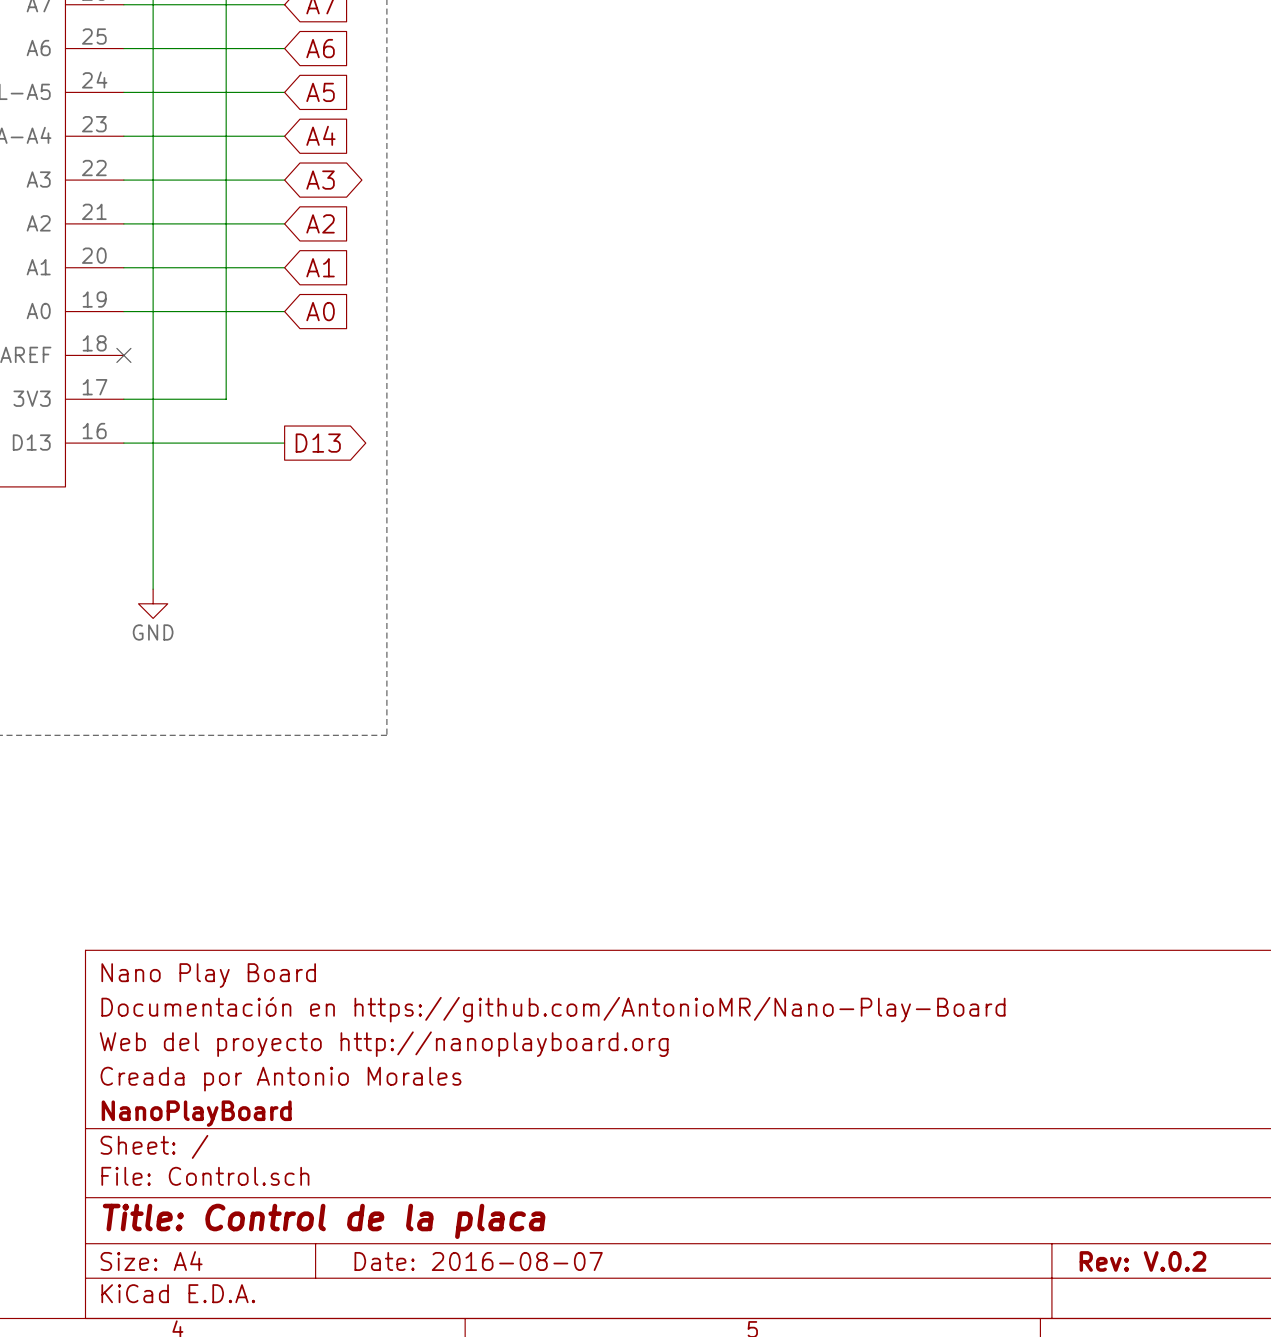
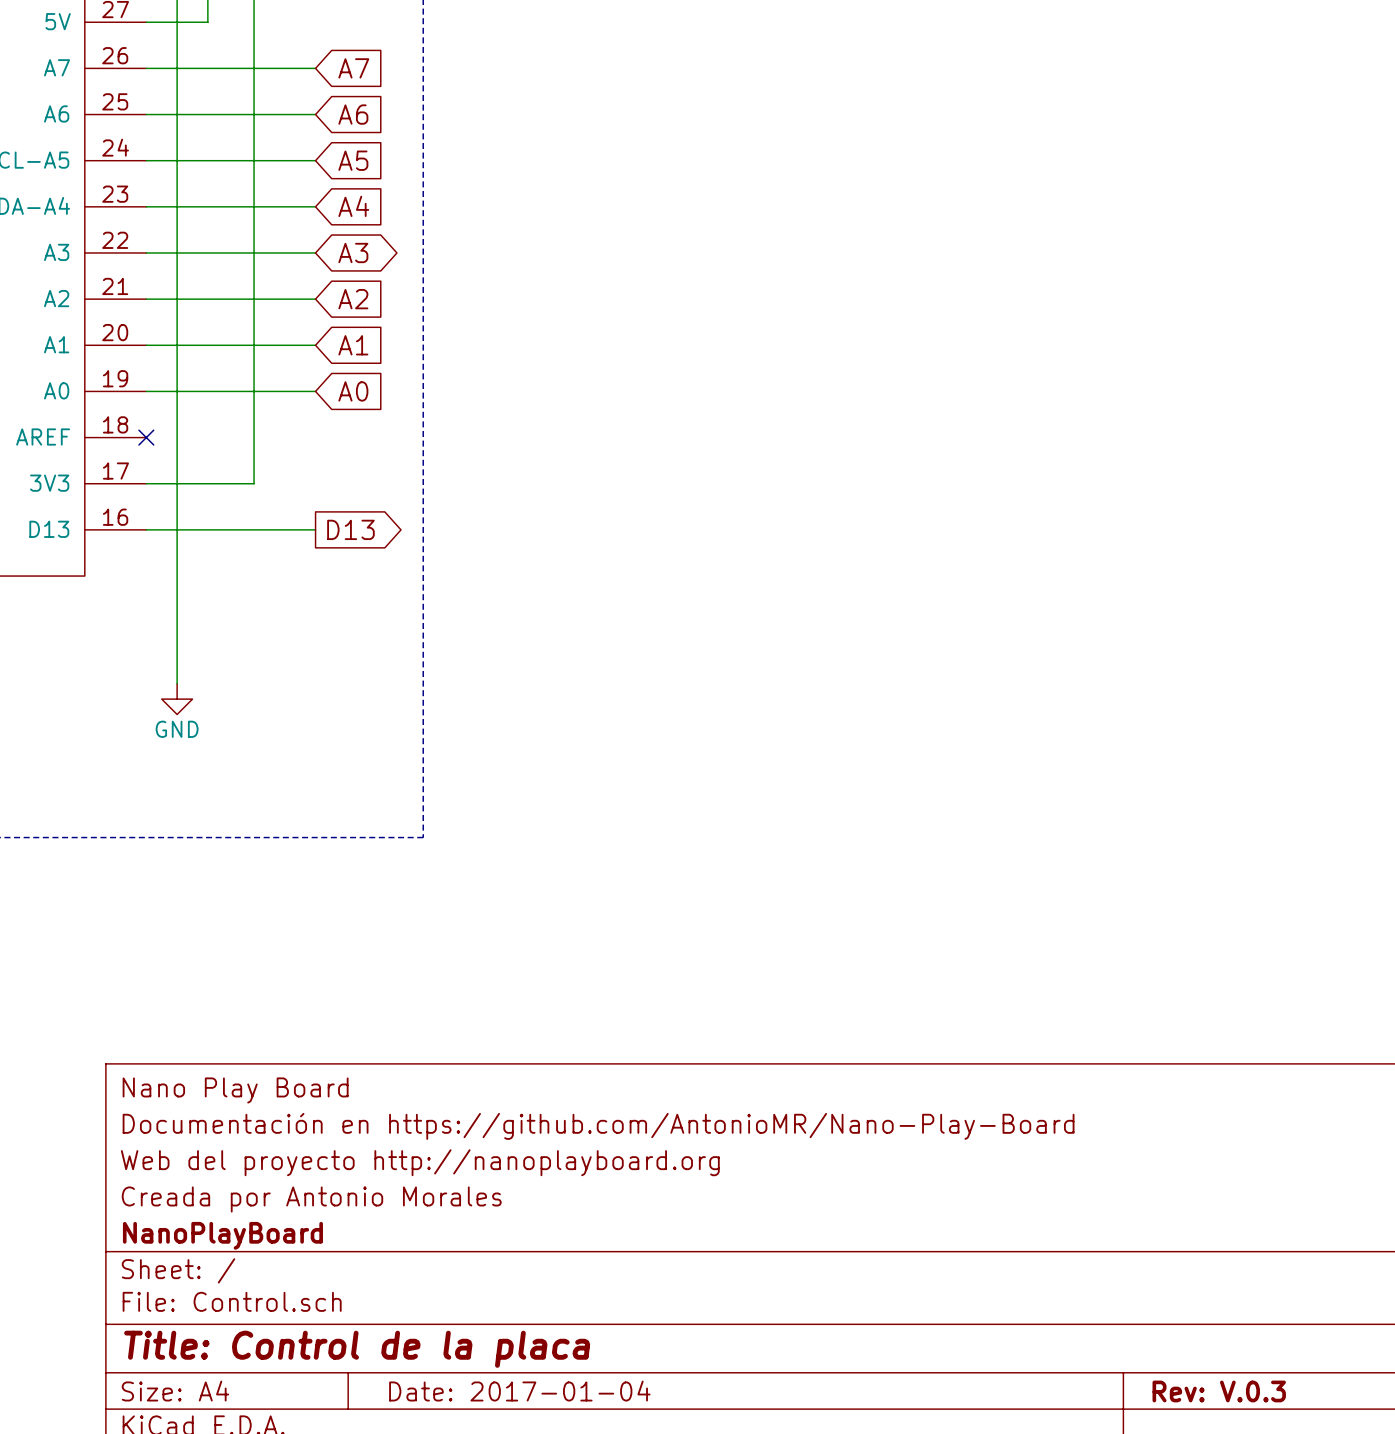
title block: Date: 2016-08-07 (478, 1261) -> Date: 2017-01-04 (519, 1391)
title block: Rev: V.0.2 (1142, 1261) -> Rev: V.0.3 (1219, 1391)

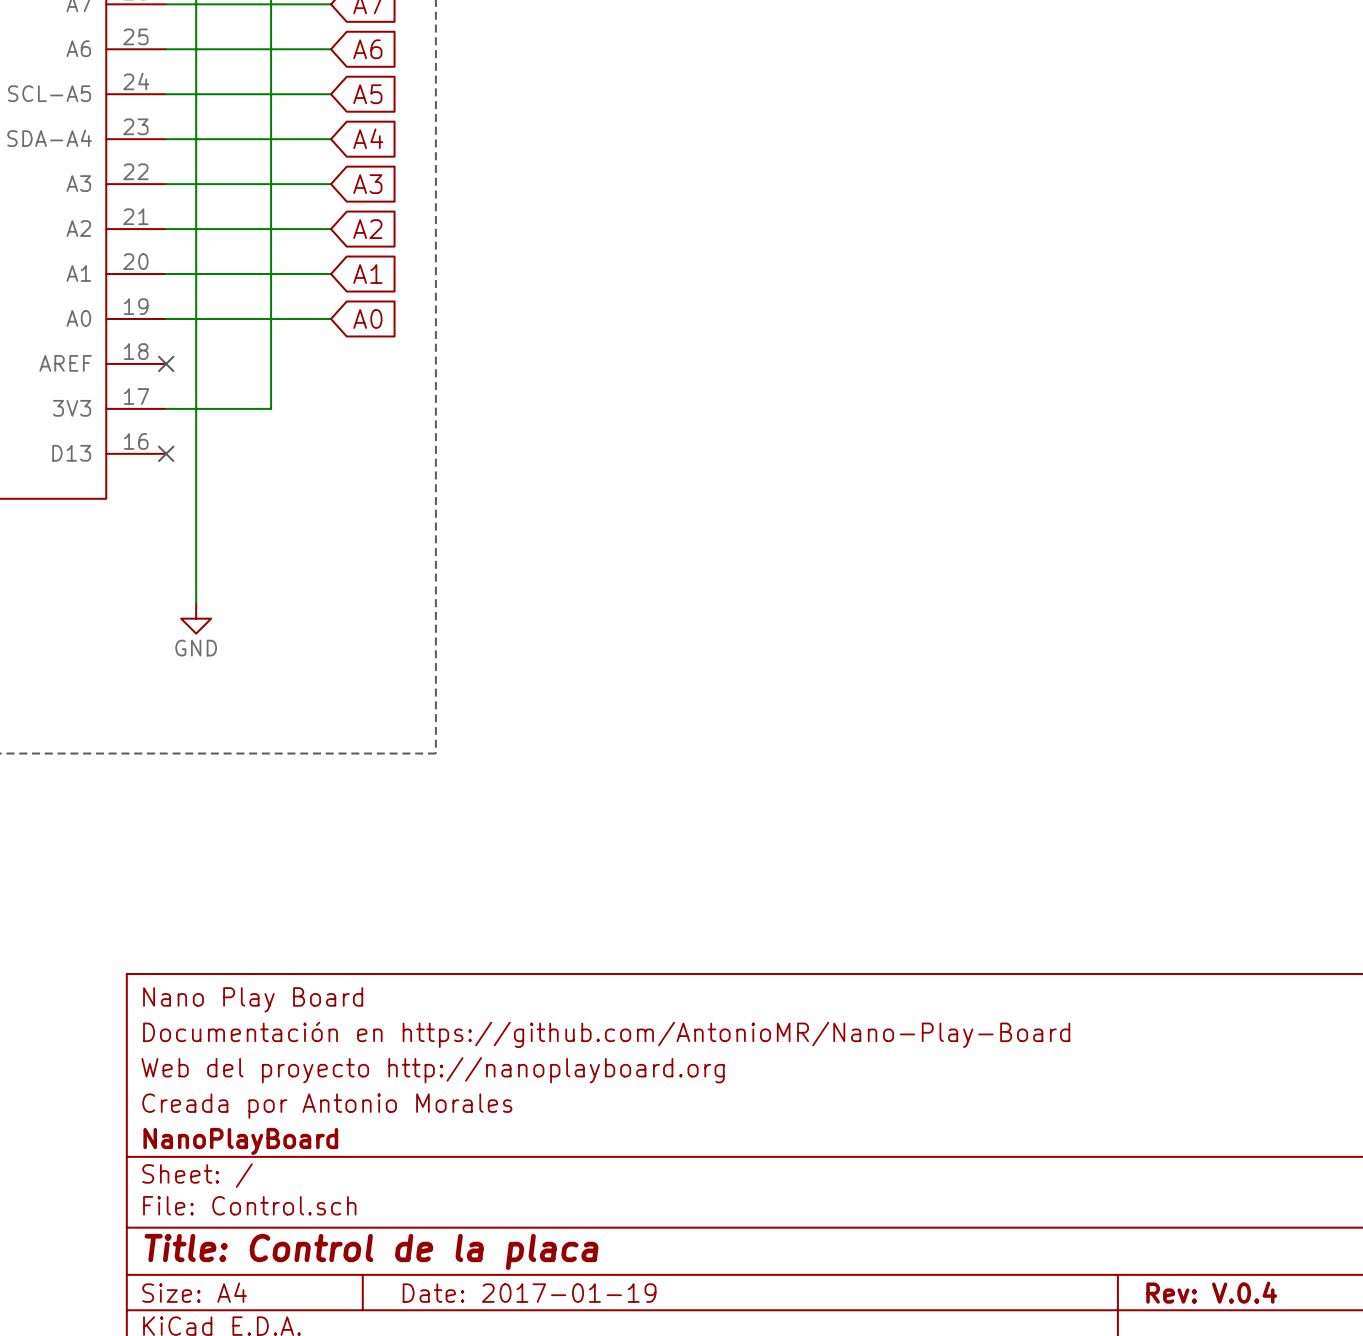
global label shape: bidirectional (353, 252) -> input (367, 184)
wire: (146, 529) (315, 529) -> none
no-connect mark: none -> (166, 453)
global label: D13 (350, 529) -> none
title block: Date: 2017-01-04 (519, 1391) -> Date: 2017-01-19 (529, 1293)
title block: Rev: V.0.3 (1219, 1391) -> Rev: V.0.4 (1211, 1292)

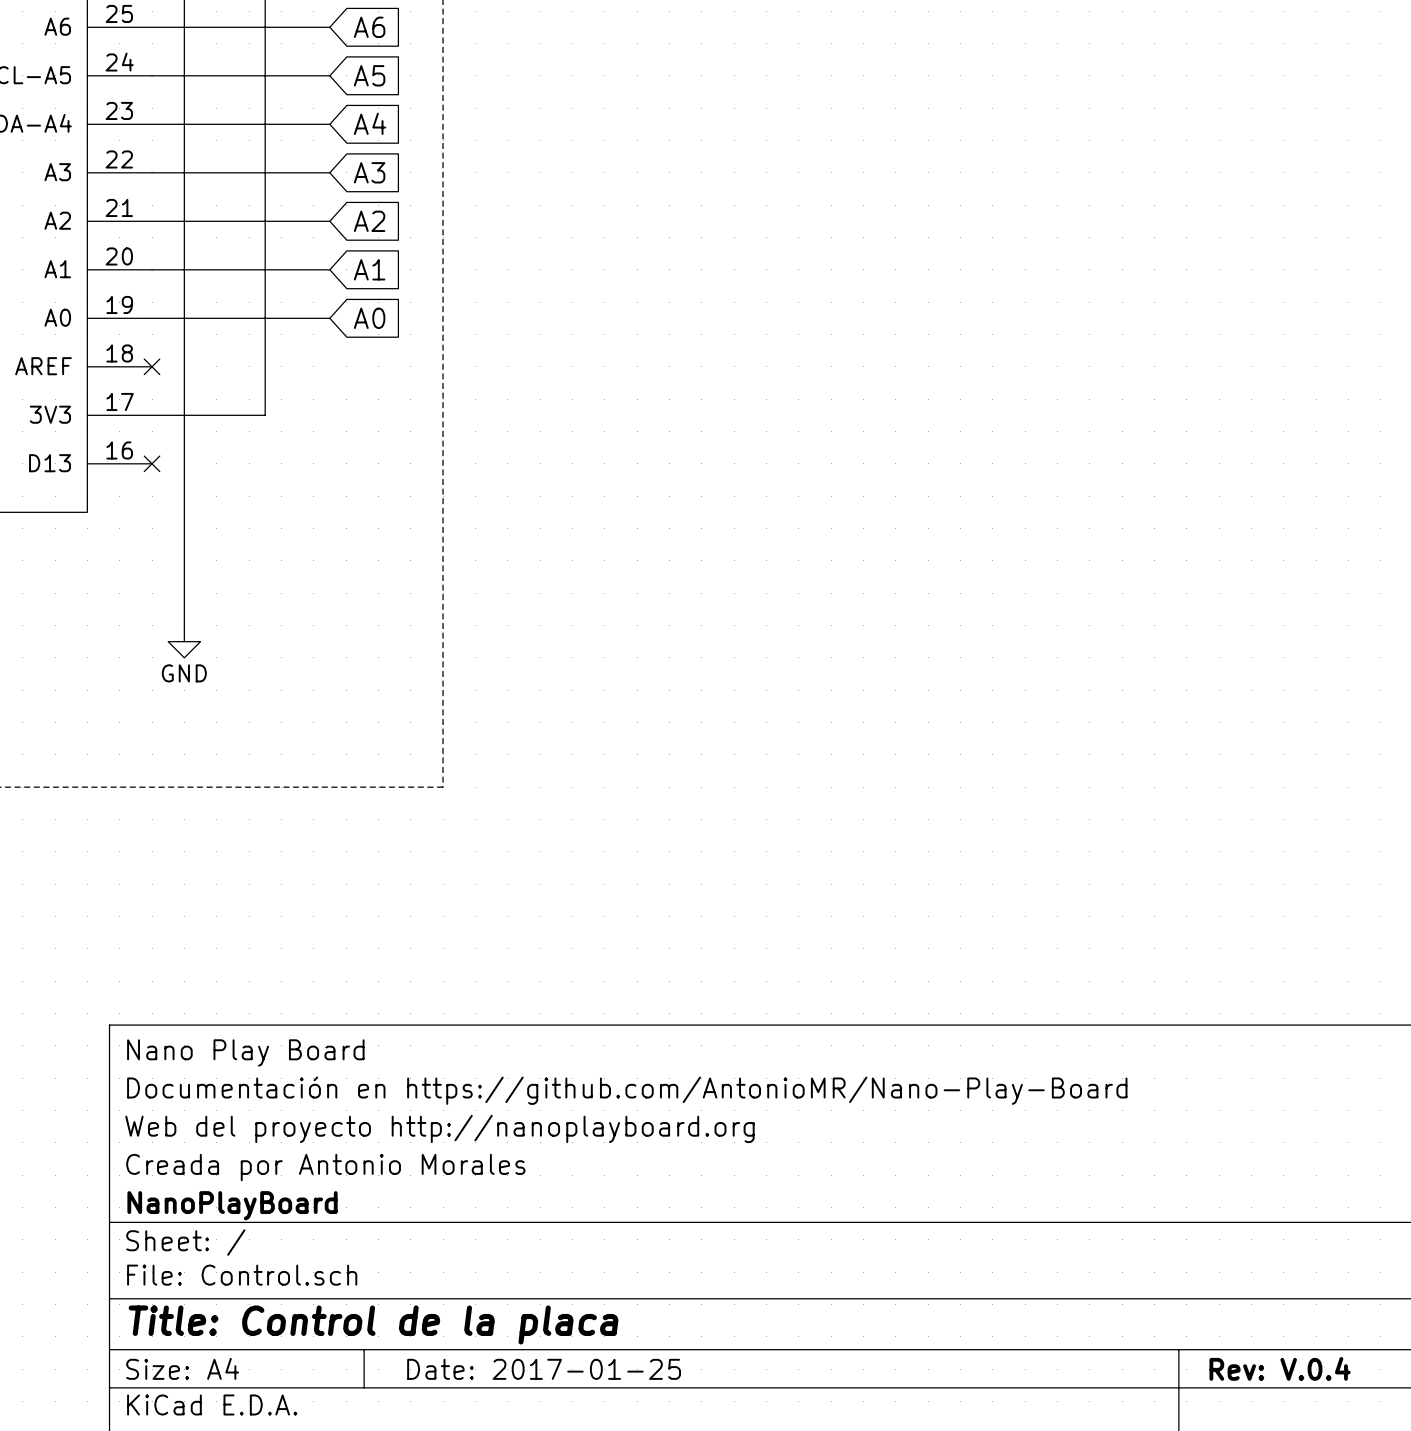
title block: Date: 2017-01-19 (529, 1293) -> Date: 2017-01-25 (544, 1369)

